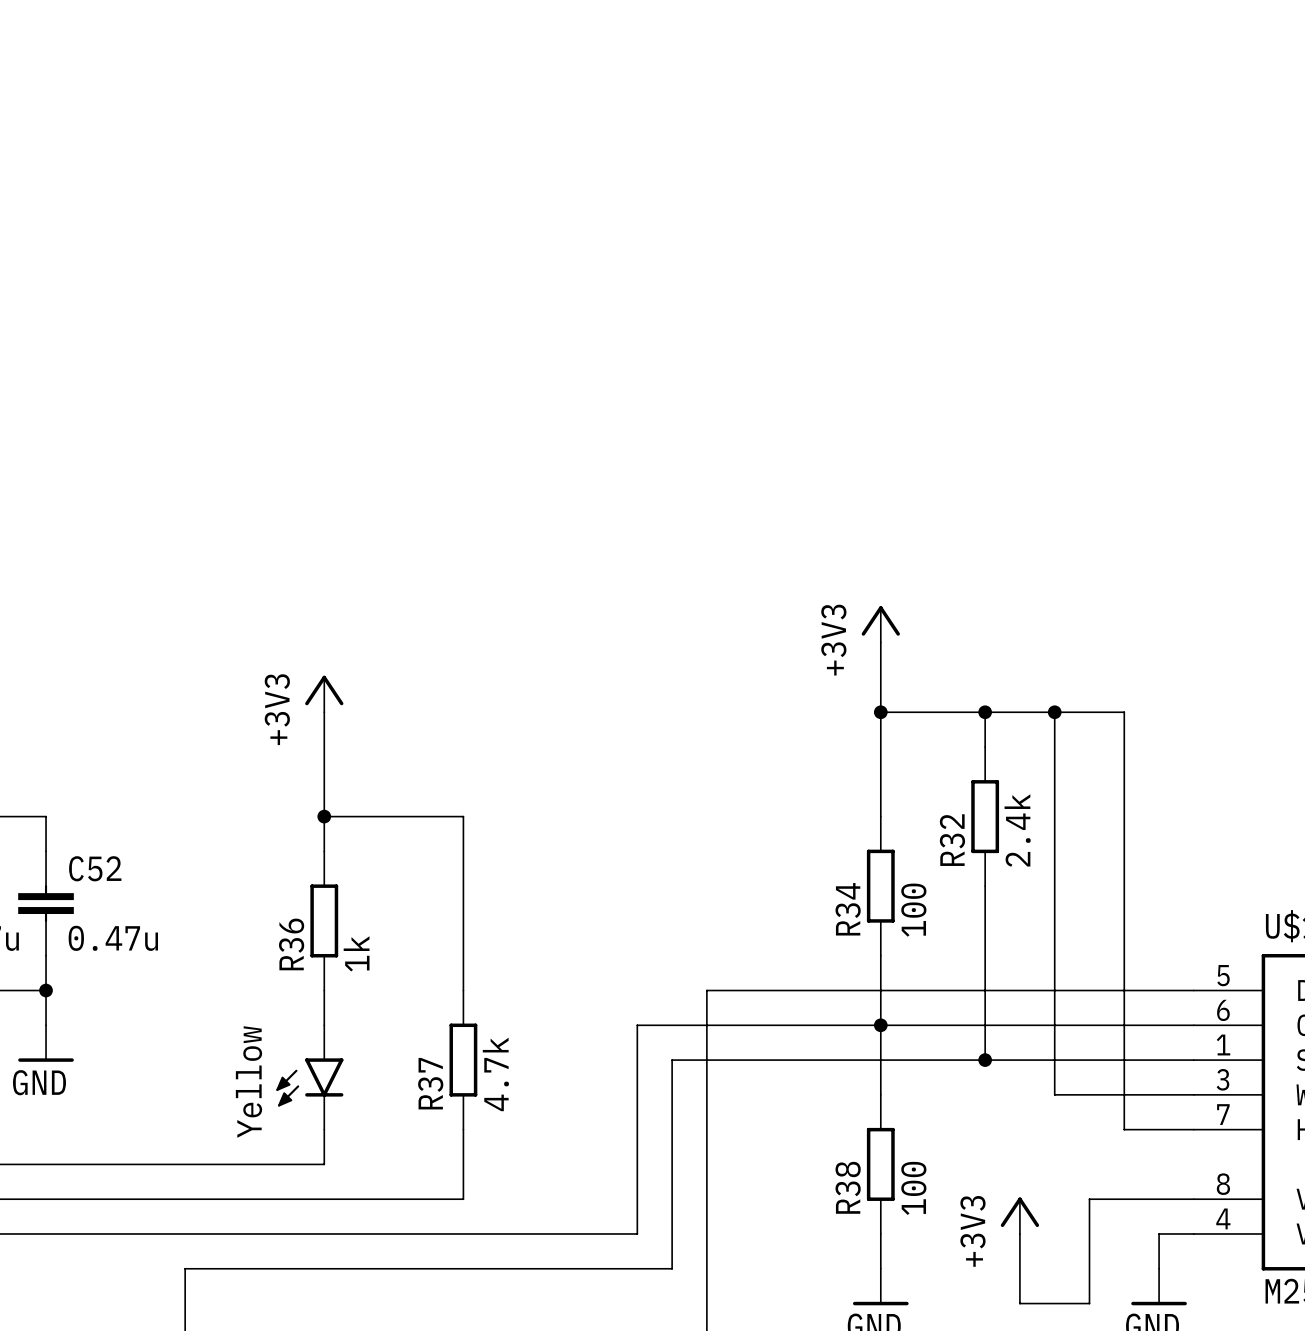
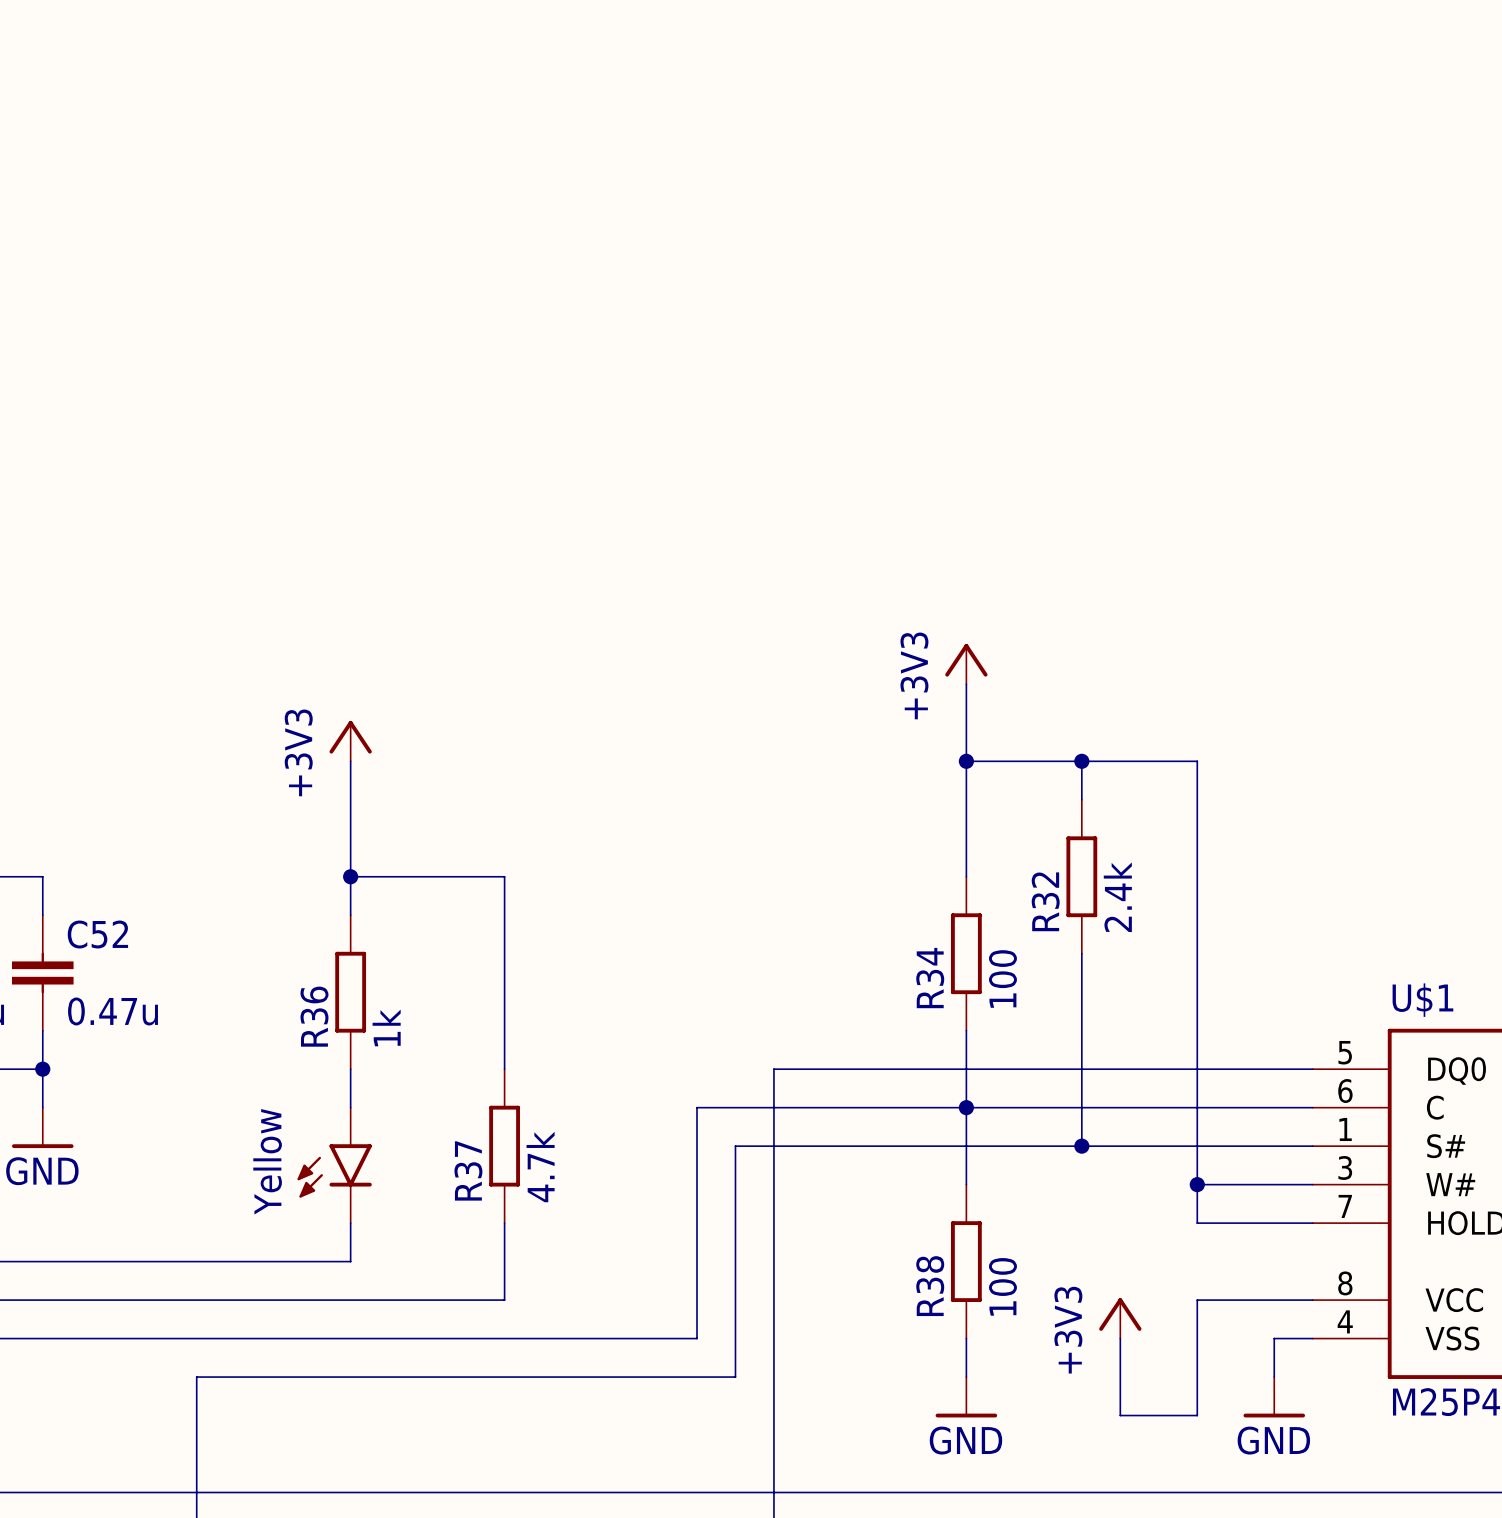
wire: (1054, 712) (1054, 1094) (1089, 1094) -> none
junction: (1054, 712) -> none
wire: (1089, 712) (1124, 712) (1124, 1129) -> (1197, 761) (1197, 1223) (1235, 1223)
junction: none -> (1197, 1184)

